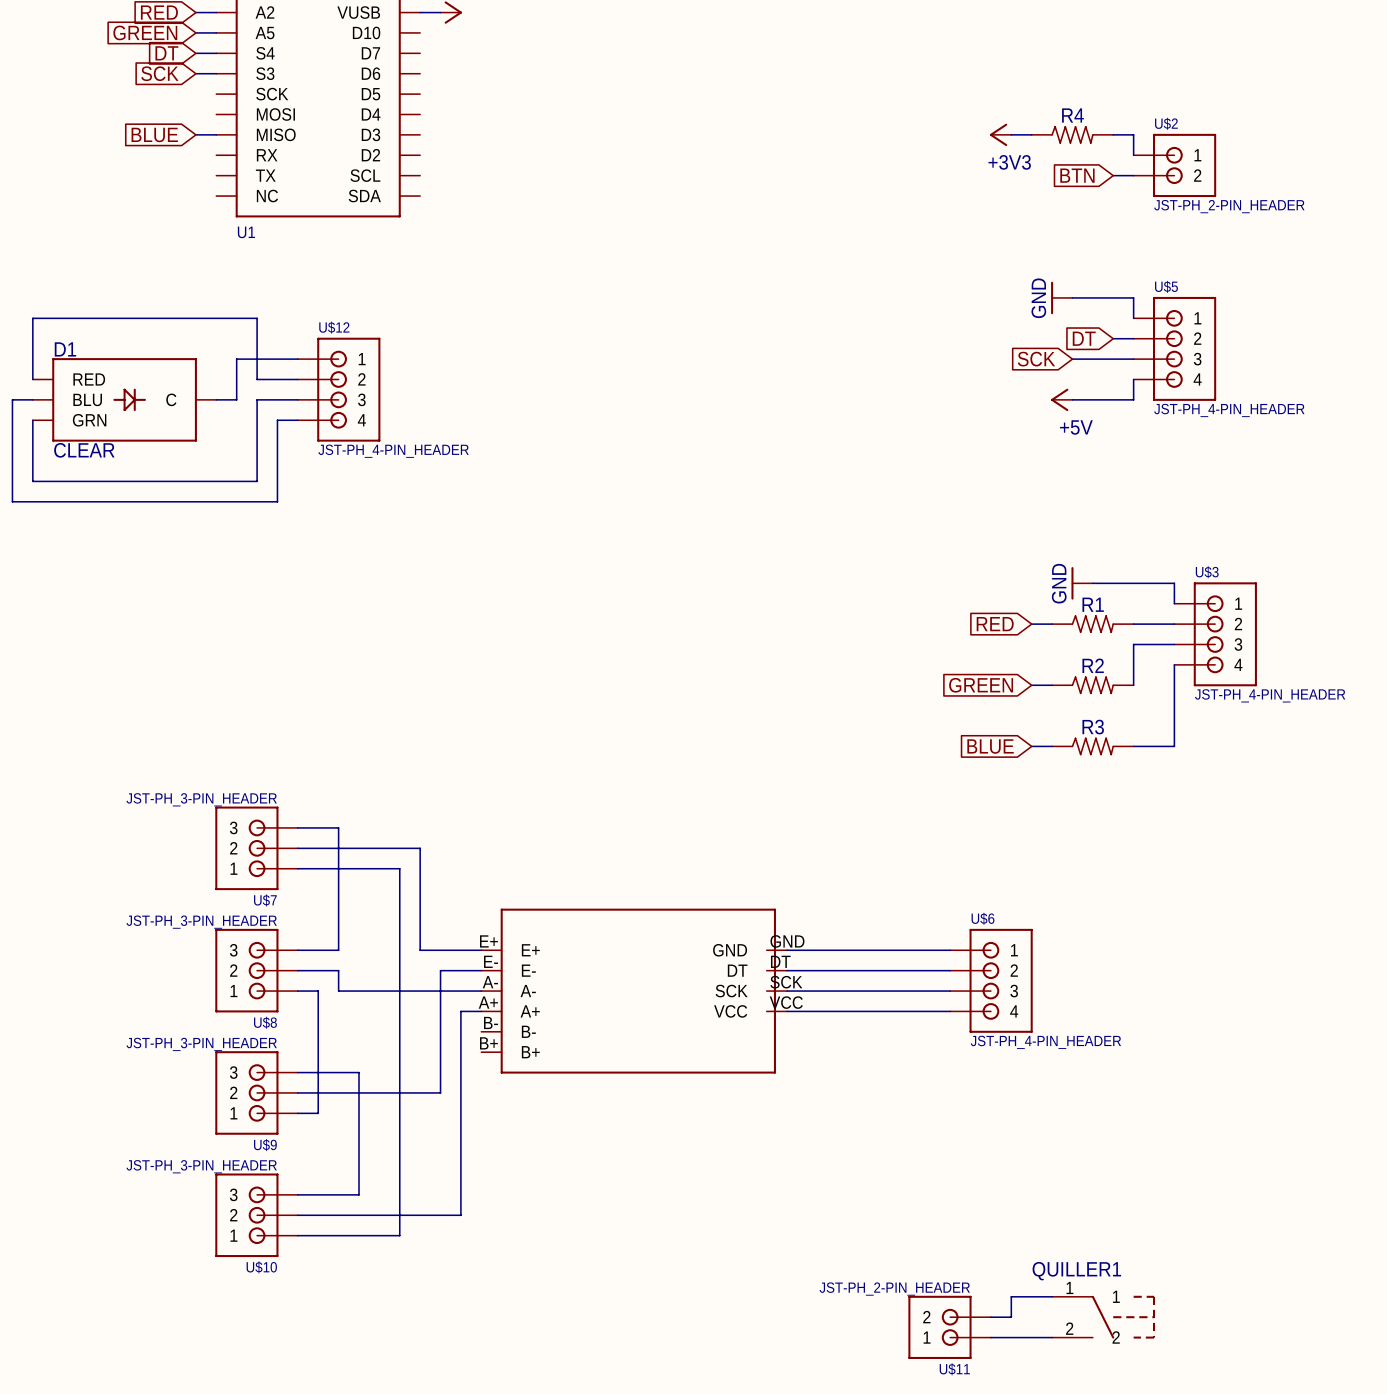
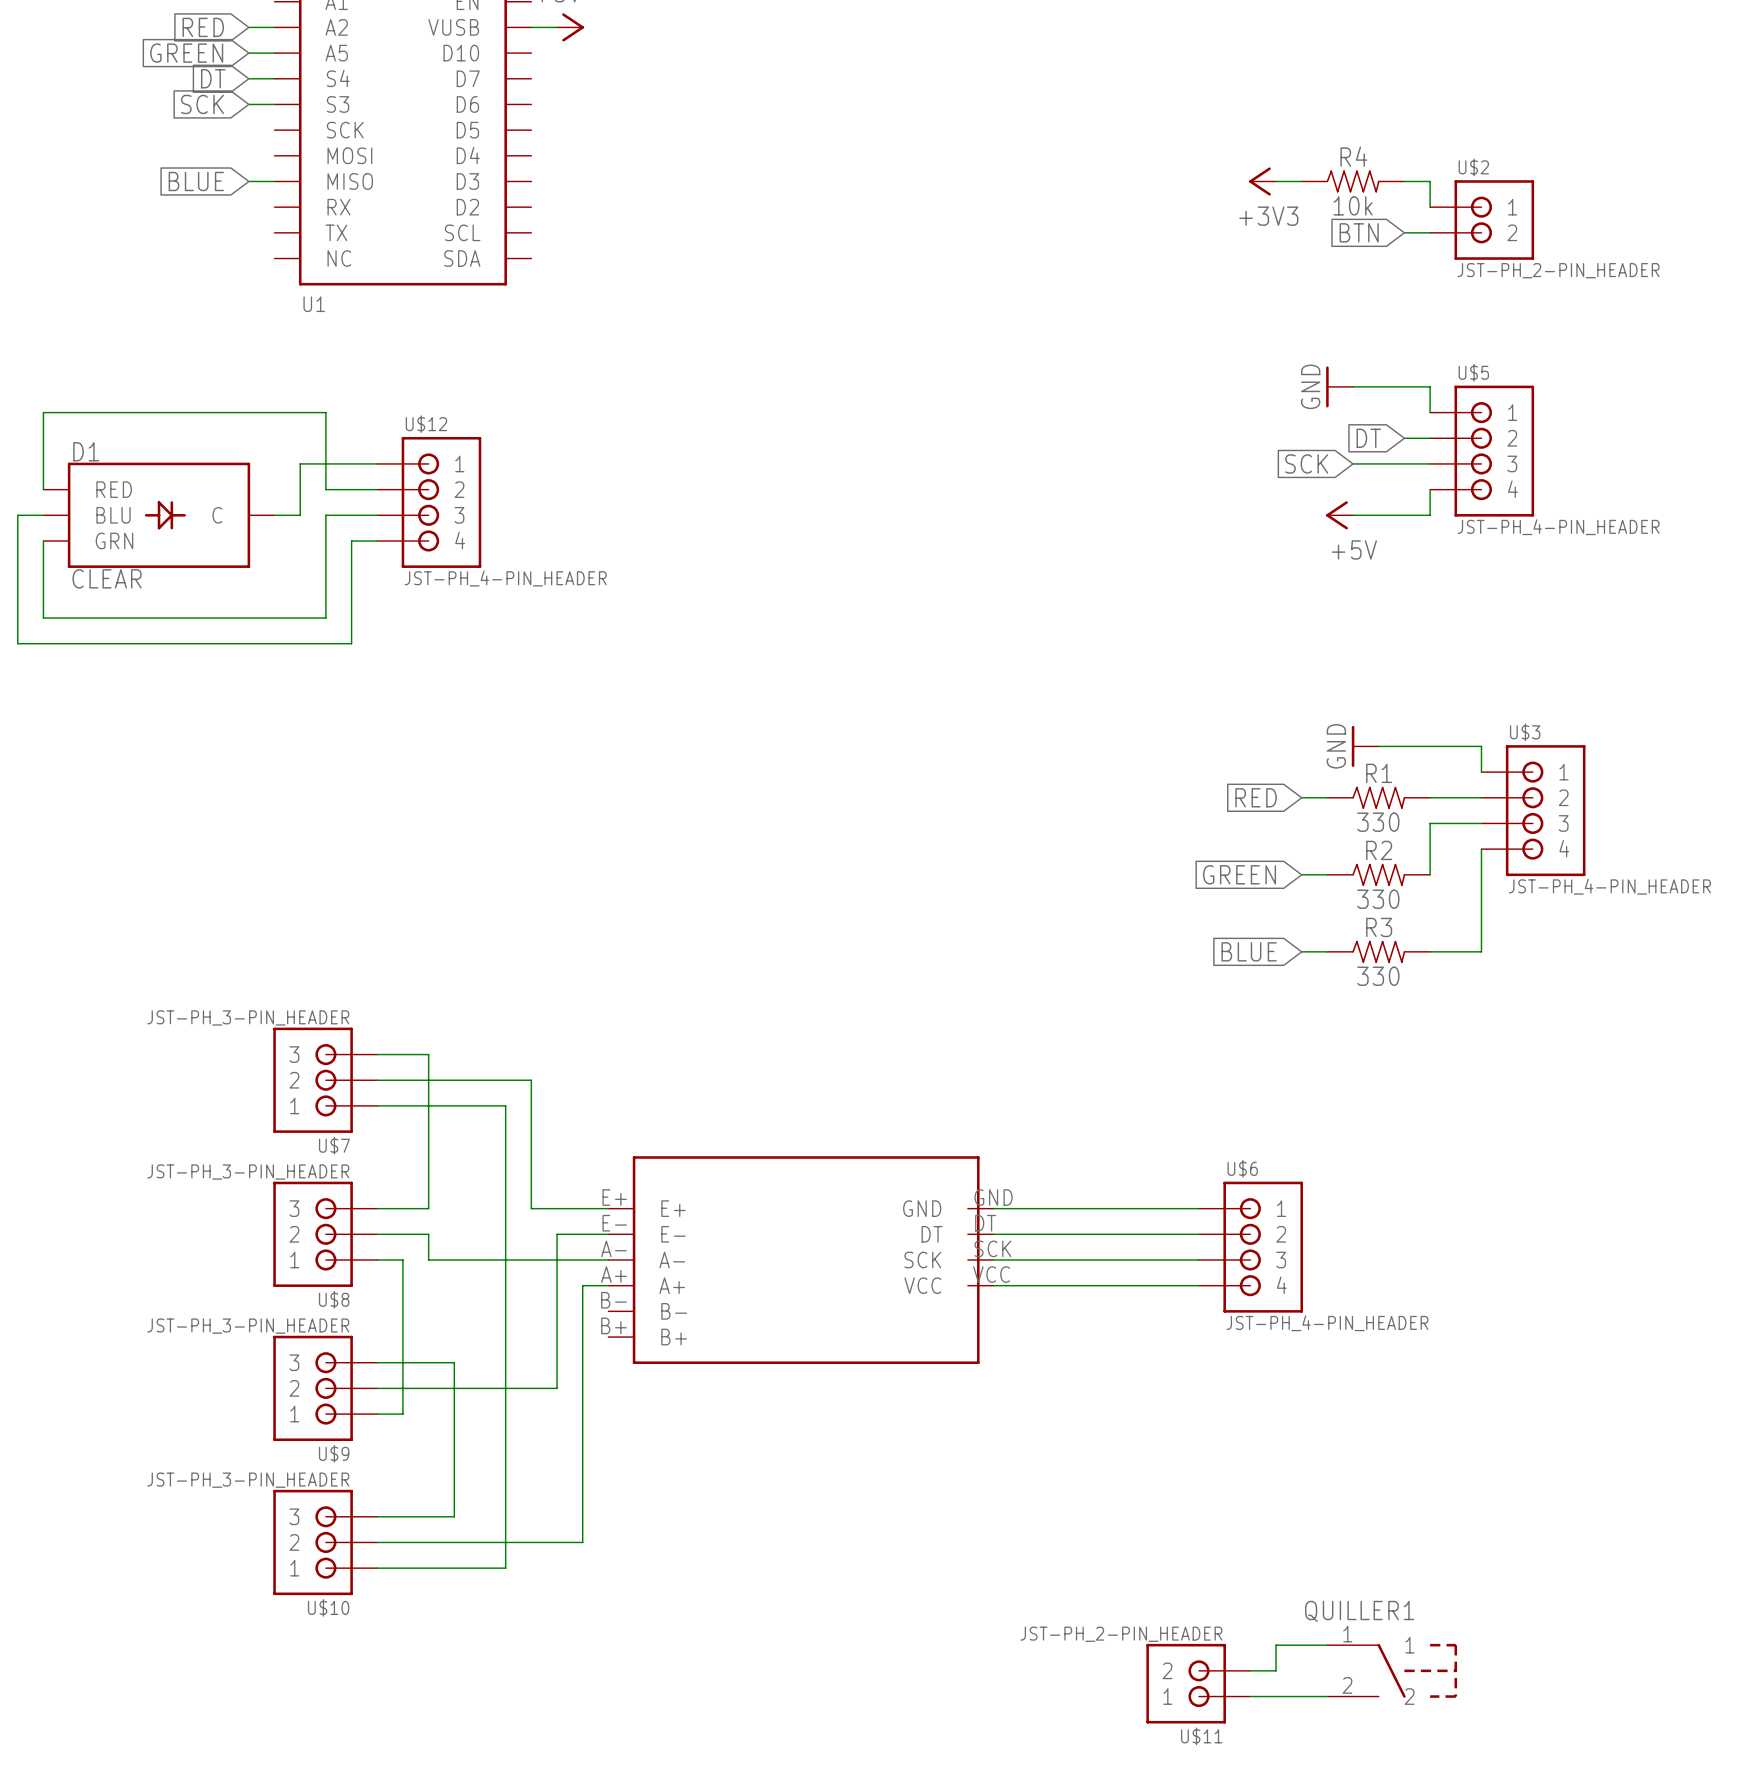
R4 value: none -> 10k (1353, 205)
R1 value: none -> 330 (1378, 822)
R2 value: none -> 330 (1378, 899)
R3 value: none -> 330 (1378, 976)

